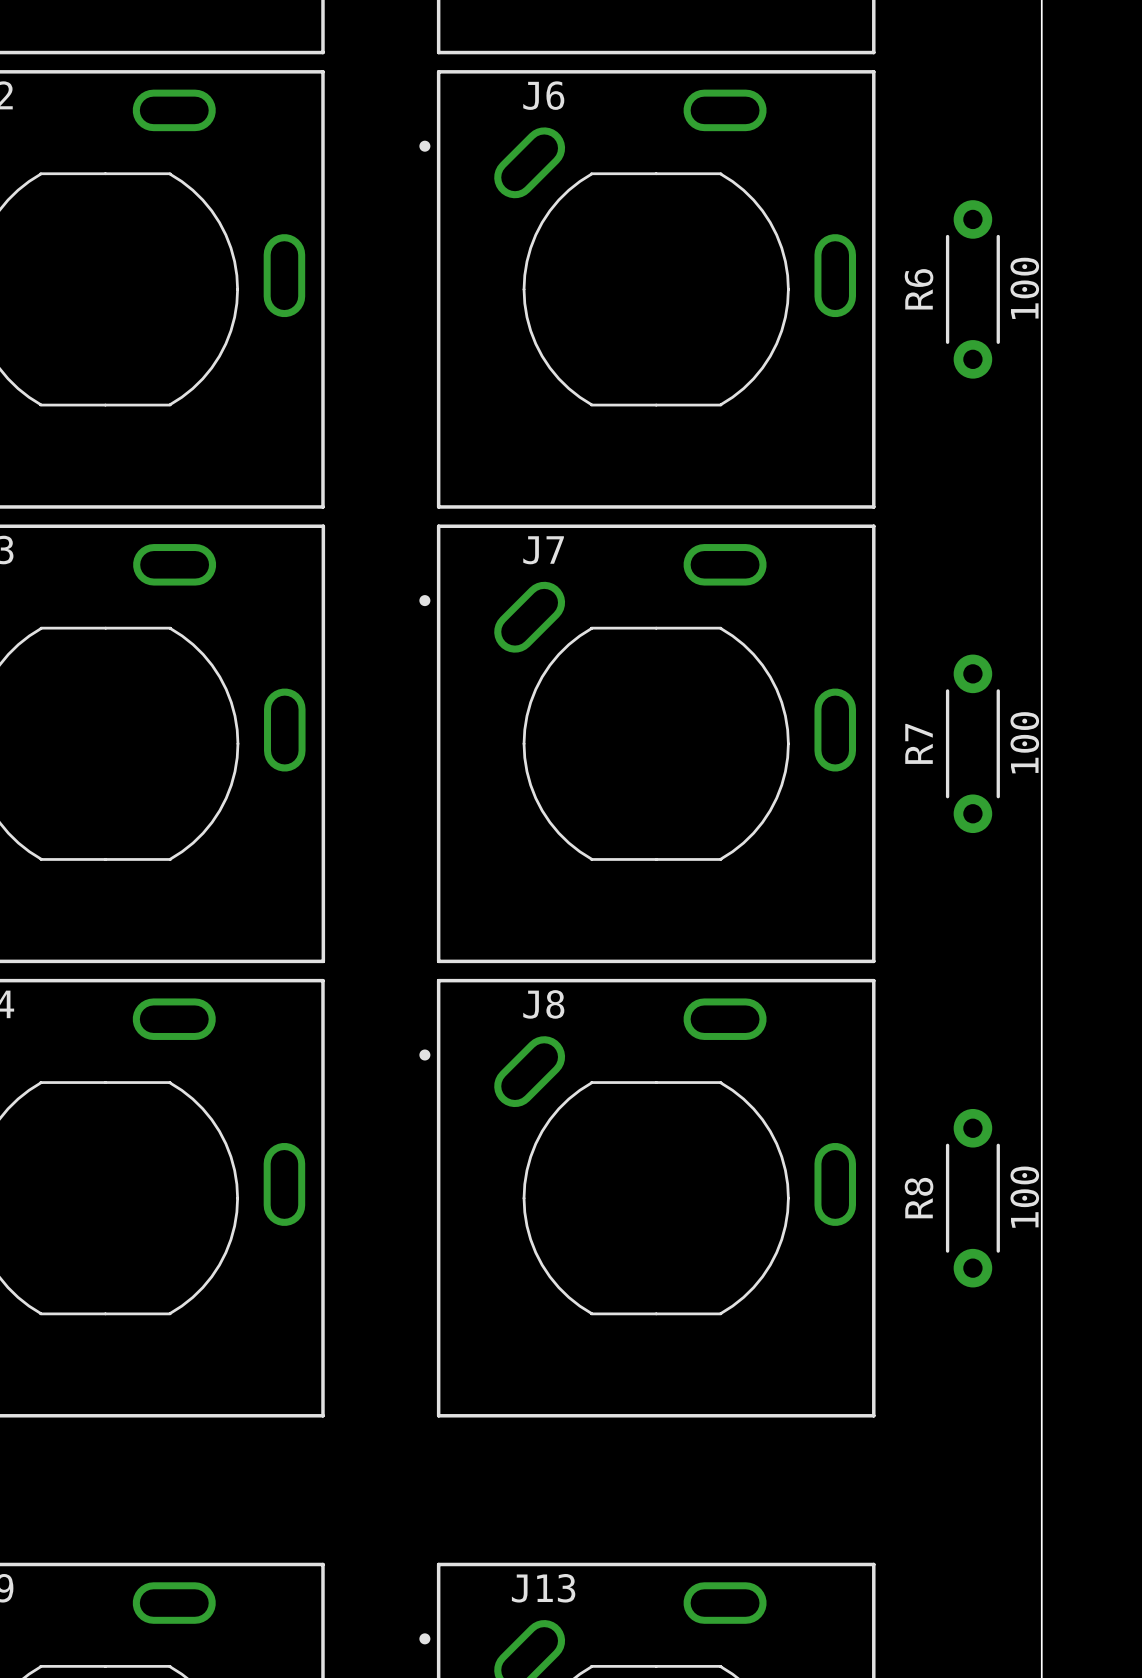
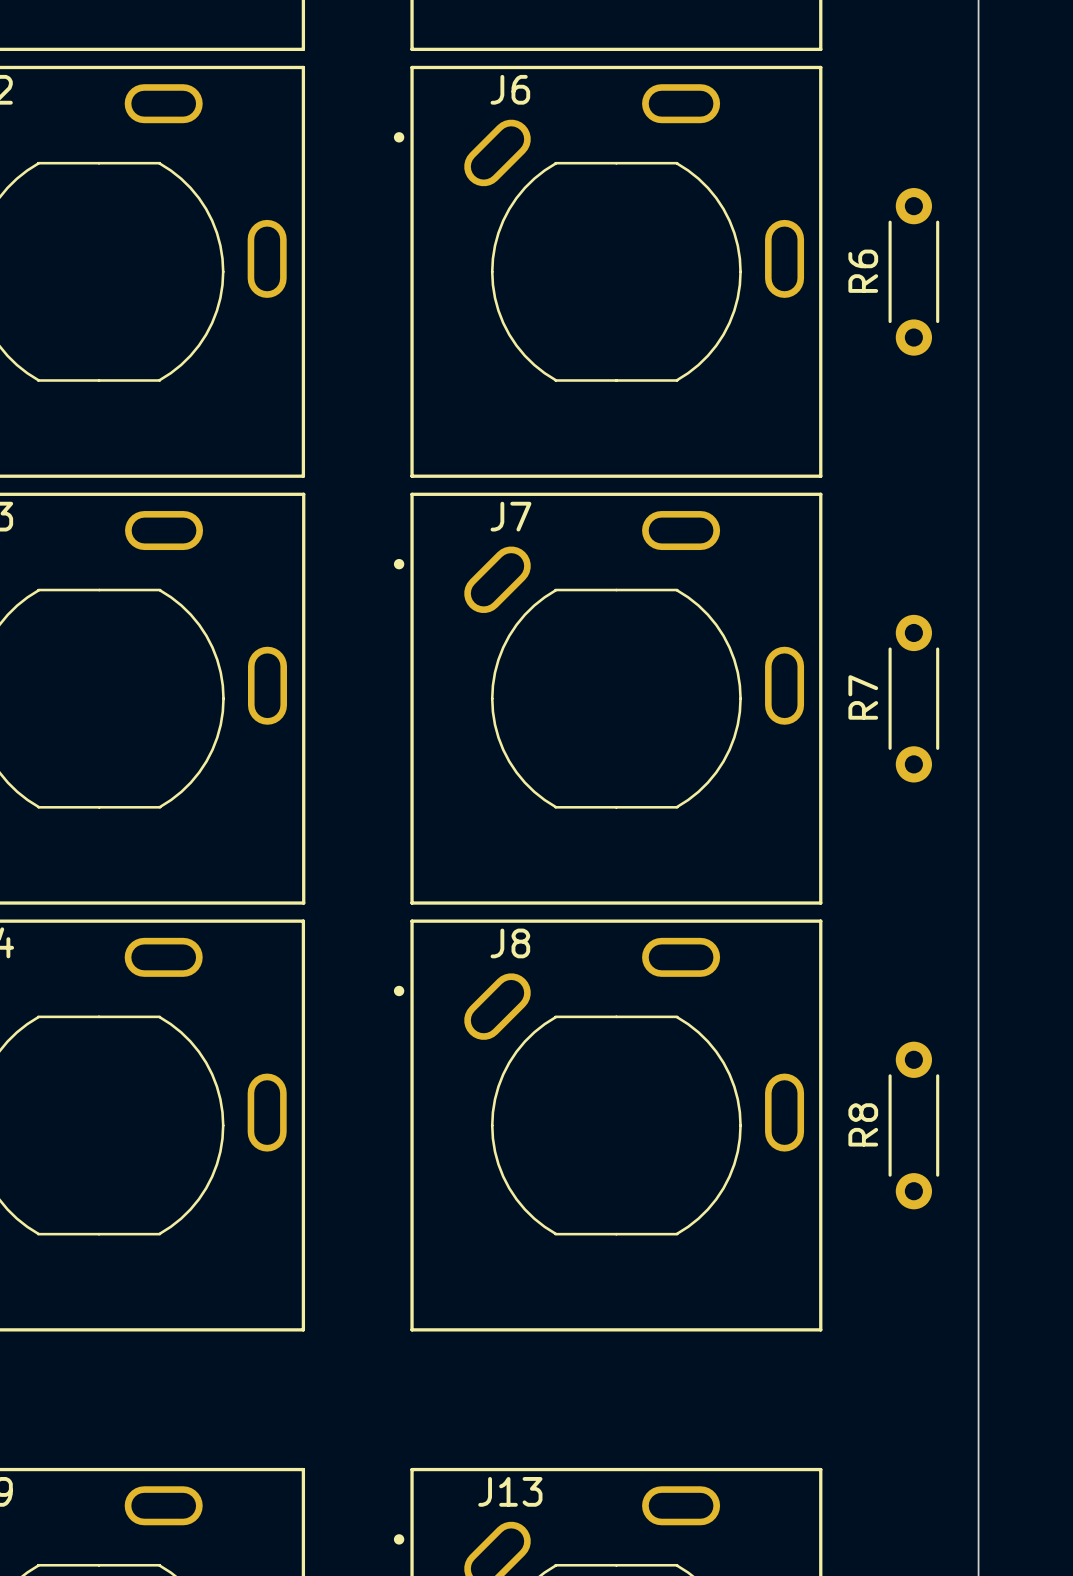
R6 value: 100 (1024, 288) -> none
R7 value: 100 (1024, 742) -> none
R8 value: 100 (1024, 1197) -> none

